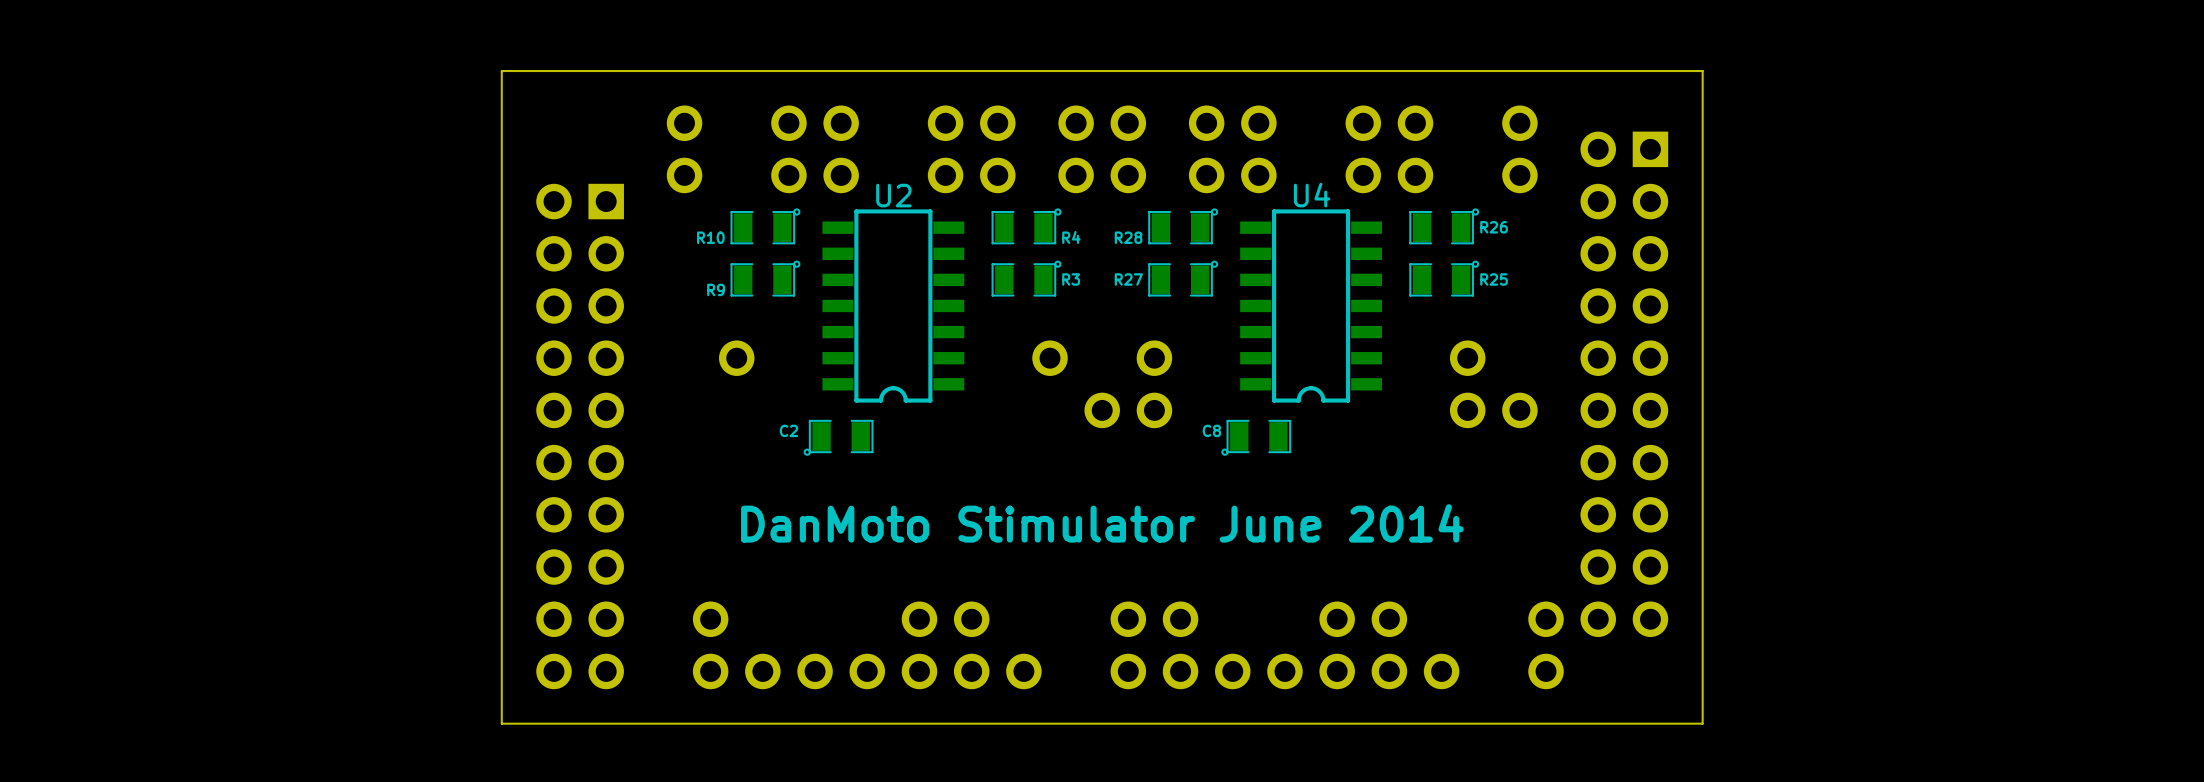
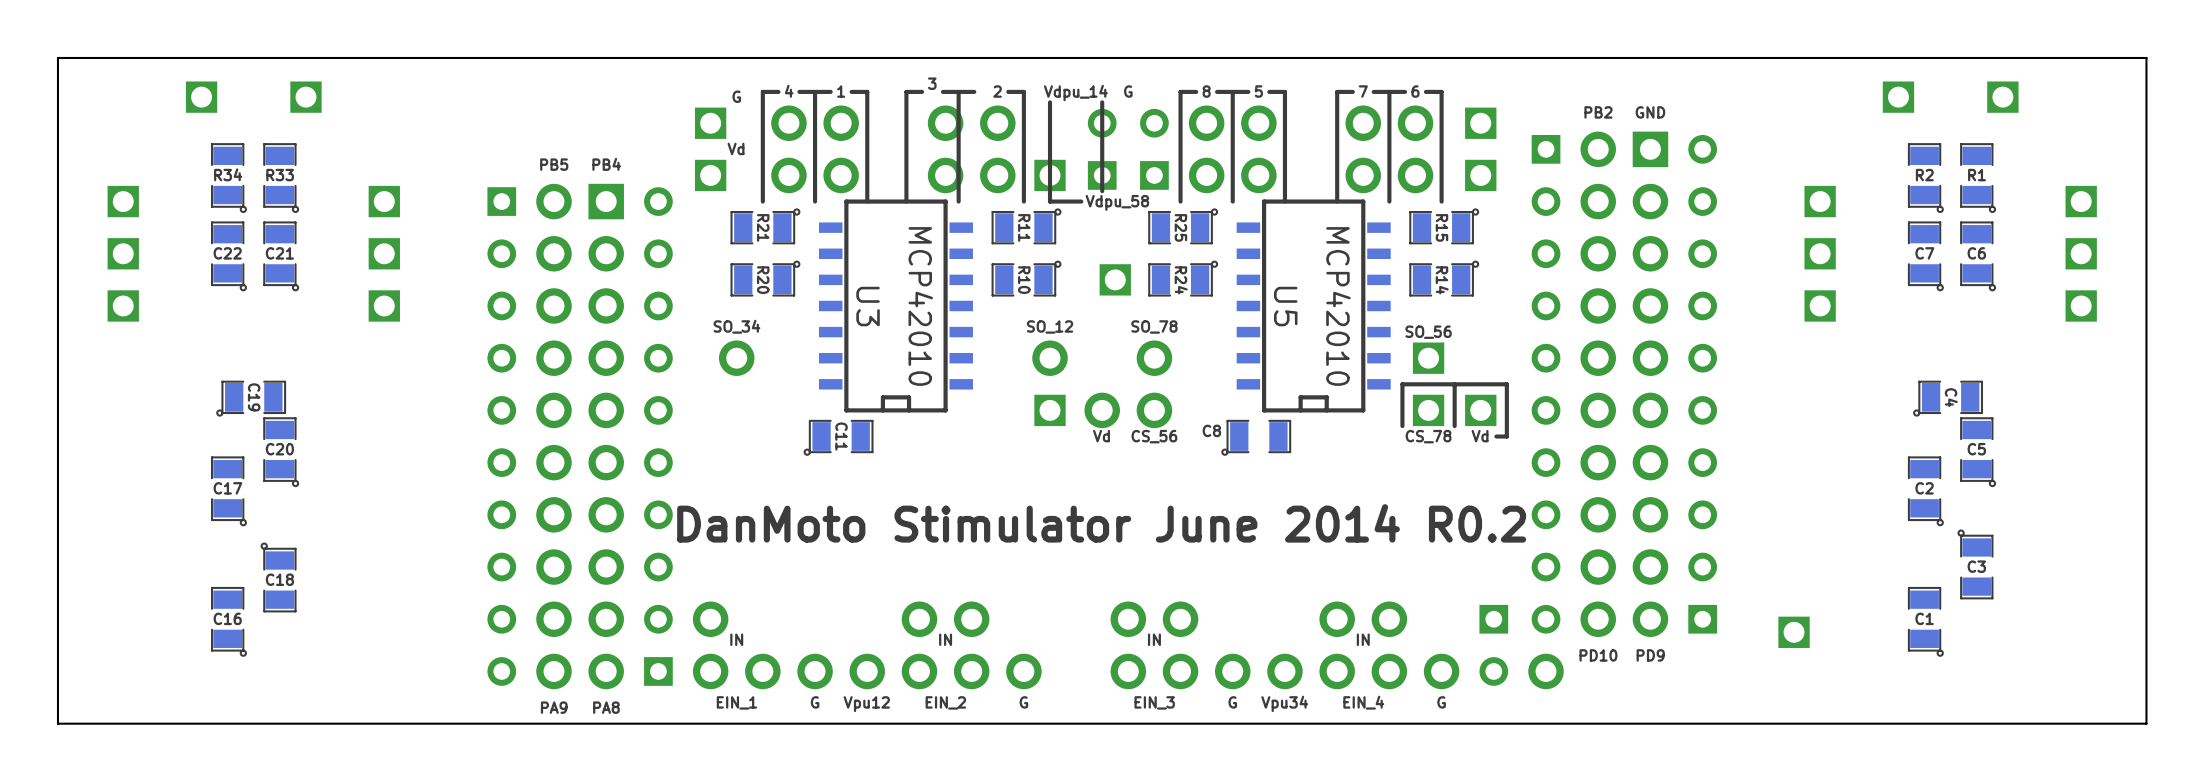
text: none -> 3 (932, 83)
line: none -> (778, 91) (762, 91) (762, 201)
text: none -> 4 (789, 91)
line: none -> (815, 91) (815, 201)
line: none -> (830, 91) (799, 91)
text: none -> 1 (841, 91)
line: none -> (851, 91) (867, 91) (867, 201)
line: none -> (922, 91) (906, 91) (906, 201)
line: none -> (958, 91) (958, 201)
line: none -> (974, 91) (942, 91)
text: none -> 2 (997, 91)
line: none -> (1008, 91) (1023, 91) (1023, 201)
text: none -> G (1128, 91)
line: none -> (1196, 91) (1180, 91) (1180, 201)
text: none -> 8 (1206, 91)
line: none -> (1232, 91) (1232, 201)
line: none -> (1248, 91) (1217, 91)
text: none -> 5 (1258, 91)
line: none -> (1269, 91) (1284, 91) (1284, 201)
line: none -> (1352, 91) (1337, 91) (1337, 201)
text: none -> 7 (1363, 91)
line: none -> (1389, 91) (1389, 201)
line: none -> (1405, 91) (1373, 91)
text: none -> 6 (1415, 91)
line: none -> (1425, 91) (1441, 91) (1441, 201)
text: none -> Vdpu_14 (1075, 93)
text: none -> G (736, 96)
part: none -> (201, 97)
part: none -> (305, 97)
part: none -> (1898, 97)
part: none -> (2002, 97)
line: none -> (1050, 102) (1050, 201) (1081, 201)
line: none -> (1102, 102) (1102, 191)
text: none -> PB2 (1598, 112)
text: none -> GND (1650, 112)
part: (684, 123) -> none
part: none -> (710, 123)
part: (1076, 123) -> none
part: (1128, 123) -> none
part: none -> (1480, 123)
part: (1519, 123) -> none
text: none -> Vd (736, 148)
part: none -> (1102, 149)
part: none -> (1154, 149)
text: none -> PB5 (554, 164)
text: none -> PB4 (606, 164)
part: (684, 175) -> none
part: none -> (710, 175)
part: none -> (1050, 175)
part: (1076, 175) -> none
part: (1128, 175) -> none
part: none -> (1480, 175)
part: (1519, 175) -> none
R34: none -> (228, 178)
R33: none -> (281, 178)
R2: none -> (1925, 178)
R1: none -> (1978, 178)
part: none -> (123, 201)
part: none -> (384, 201)
part: none -> (1820, 201)
part: none -> (2081, 201)
text: none -> Vdpu_58 (1117, 202)
R26 name: R26 (1494, 227) -> R15 (1441, 227)
R10 name: R10 (710, 237) -> R21 (763, 227)
R4 name: R4 (1071, 237) -> R11 (1024, 227)
R28 name: R28 (1128, 237) -> R25 (1180, 227)
part: none -> (123, 253)
part: none -> (384, 253)
part: none -> (1820, 253)
part: none -> (2081, 253)
C22: none -> (228, 256)
C21: none -> (281, 256)
C7: none -> (1925, 256)
C6: none -> (1978, 256)
R3 name: R3 (1071, 279) -> R10 (1024, 280)
part: none -> (1115, 279)
R27 name: R27 (1128, 279) -> R24 (1181, 280)
R25 name: R25 (1494, 279) -> R14 (1442, 280)
R9 name: R9 (716, 289) -> R20 (763, 280)
part: none -> (123, 305)
part: none -> (384, 305)
U2: (893, 305) -> none
U3: none -> MCP42010 (895, 305)
U4: (1311, 305) -> none
U5: none -> MCP42010 (1313, 305)
part: none -> (1820, 305)
part: none -> (2081, 305)
text: none -> SO_34 (736, 326)
text: none -> SO_12 (1050, 326)
text: none -> SO_78 (1154, 326)
text: none -> SO_56 (1428, 332)
part: none -> (1428, 358)
part: (1467, 358) -> none
line: none -> (1454, 384) (1454, 426)
part: none -> (1546, 384)
part: none -> (1702, 384)
part footprint: [1449, 392, 1486, 429] -> [1465, 394, 1497, 427]
C19: none -> (251, 398)
C4: none -> (1948, 398)
part: none -> (1050, 410)
part: none -> (1428, 410)
part: (1519, 410) -> none
line: none -> (1402, 426) (1402, 384) (1506, 384) (1506, 436) (1496, 436)
C2 name: C2 (788, 430) -> C11 (841, 436)
part: none -> (501, 436)
part: none -> (658, 436)
text: none -> Vd (1101, 436)
text: none -> CS_56 (1154, 436)
text: none -> CS_78 (1428, 436)
text: none -> Vd (1480, 436)
C20: none -> (281, 452)
C5: none -> (1978, 452)
C17: none -> (228, 491)
C2: none -> (1925, 491)
text: DanMoto Stimulator June 2014 (1102, 523) -> DanMoto Stimulator June 2014 R0.2 (1101, 523)
C3: none -> (1975, 564)
C18: none -> (278, 577)
part: (1546, 619) -> none
C16: none -> (228, 621)
C1: none -> (1925, 621)
part: none -> (1794, 632)
text: none -> IN (736, 639)
text: none -> IN (945, 639)
text: none -> IN (1154, 639)
text: none -> IN (1363, 639)
part: none -> (1493, 645)
text: none -> PD10 (1598, 655)
text: none -> PD9 (1650, 655)
text: none -> EIN_1 (736, 702)
text: none -> G (815, 702)
text: none -> EIN_2 (945, 702)
text: none -> G (1023, 702)
text: none -> EIN_3 (1154, 702)
text: none -> G (1232, 702)
text: none -> EIN_4 (1363, 702)
text: none -> G (1441, 702)
text: none -> Vpu34 (1284, 703)
text: none -> Vpu12 (866, 704)
text: none -> PA9 (554, 707)
text: none -> PA8 (606, 707)
board edge: (1702, 723) (1702, 71) (501, 71) (501, 723) -> (1702, 723) (2146, 723) (2146, 57) (57, 57) (57, 723) (501, 723)

